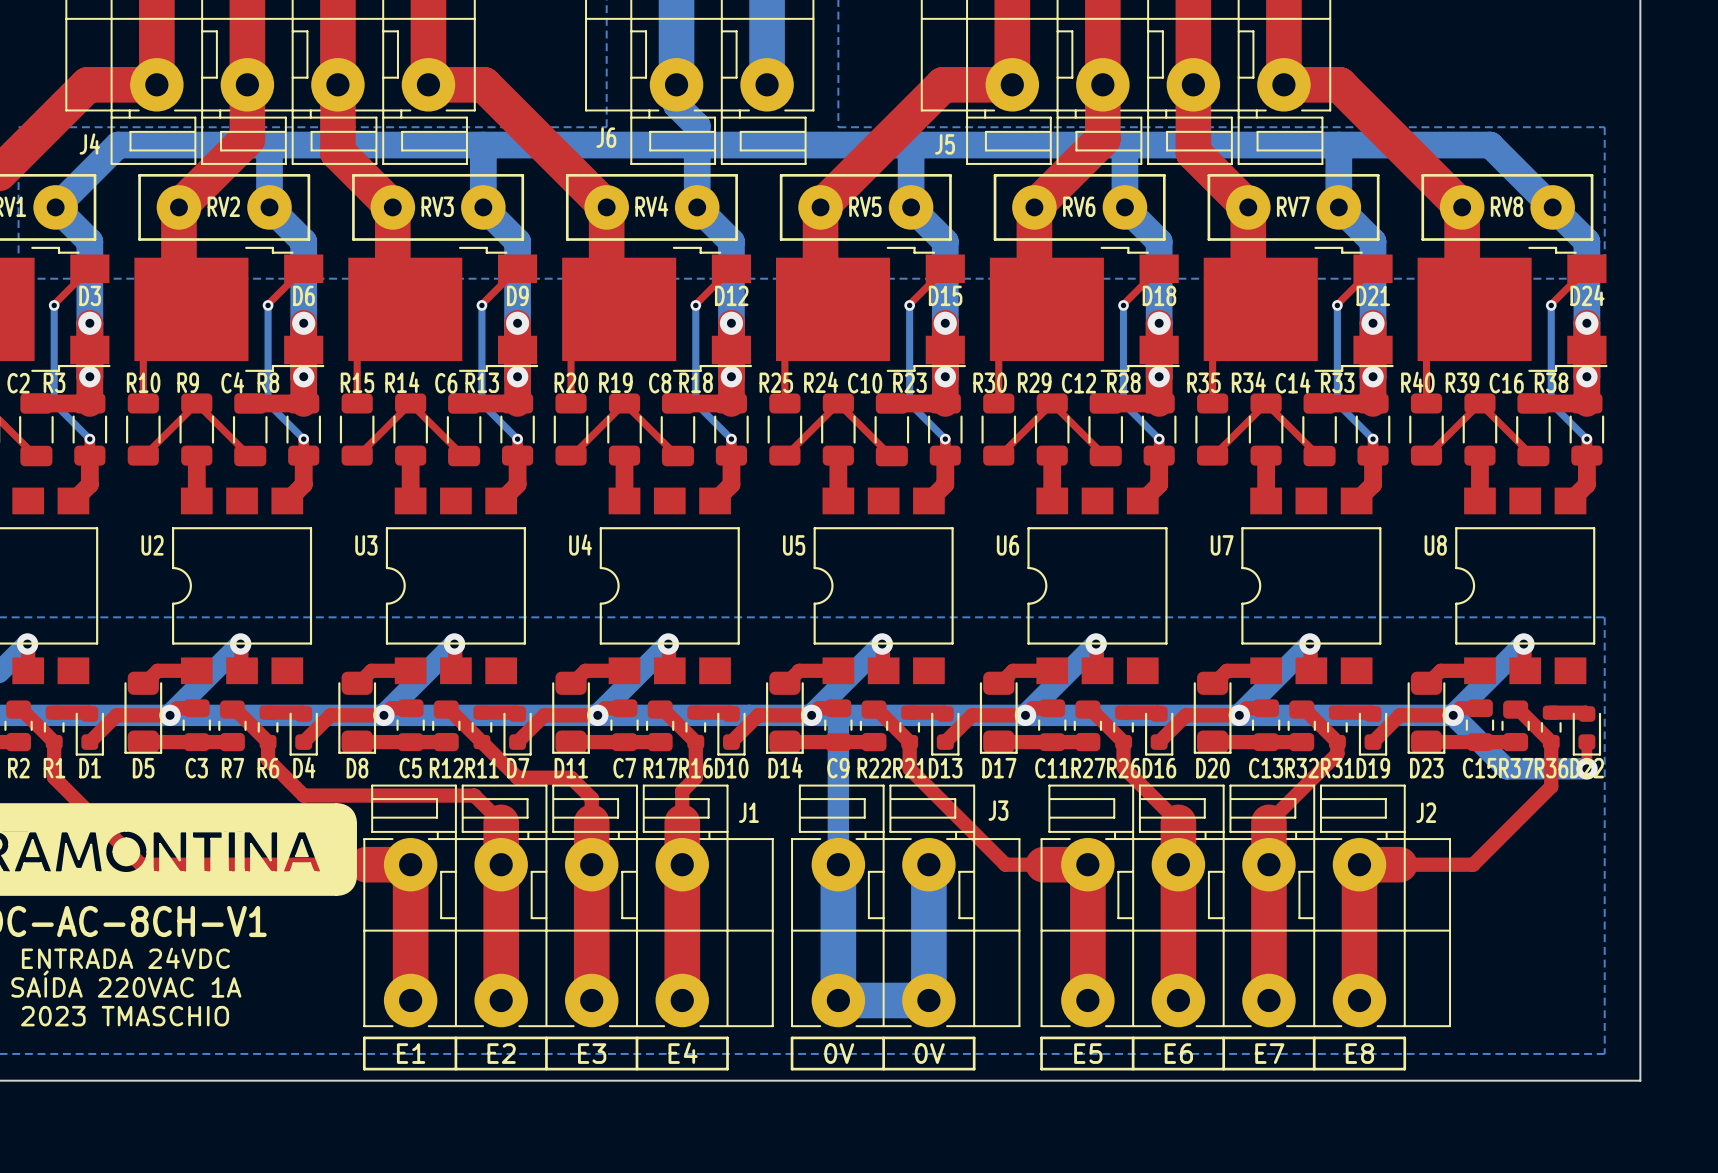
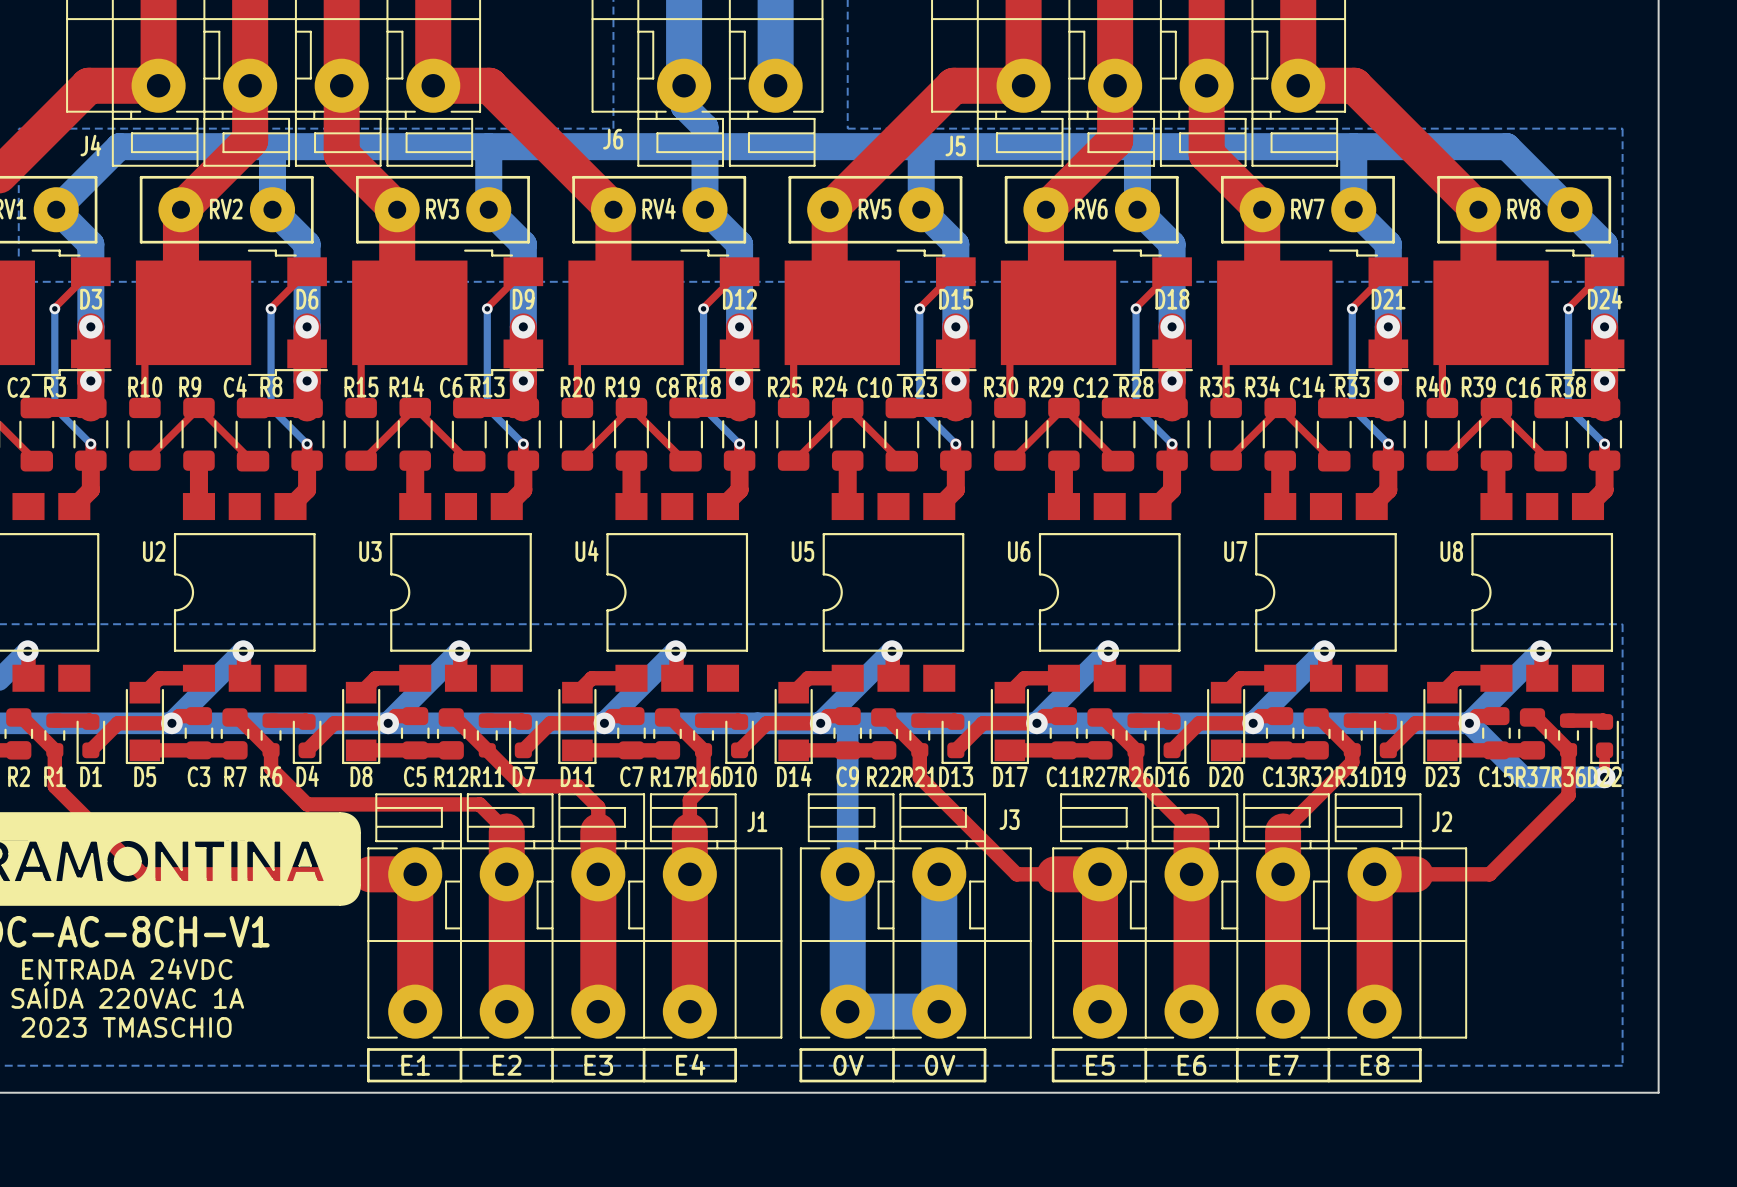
D5 footprint: [124, 671, 163, 754] -> [125, 681, 165, 765]
D8 footprint: [338, 671, 377, 754] -> [342, 681, 381, 765]
D11 footprint: [552, 671, 590, 754] -> [558, 681, 597, 765]
D14 footprint: [766, 671, 804, 754] -> [774, 681, 813, 765]
D17 footprint: [979, 671, 1018, 754] -> [990, 681, 1030, 765]
D20 footprint: [1193, 671, 1232, 754] -> [1207, 681, 1246, 765]
D23 footprint: [1407, 671, 1446, 754] -> [1423, 681, 1462, 765]

